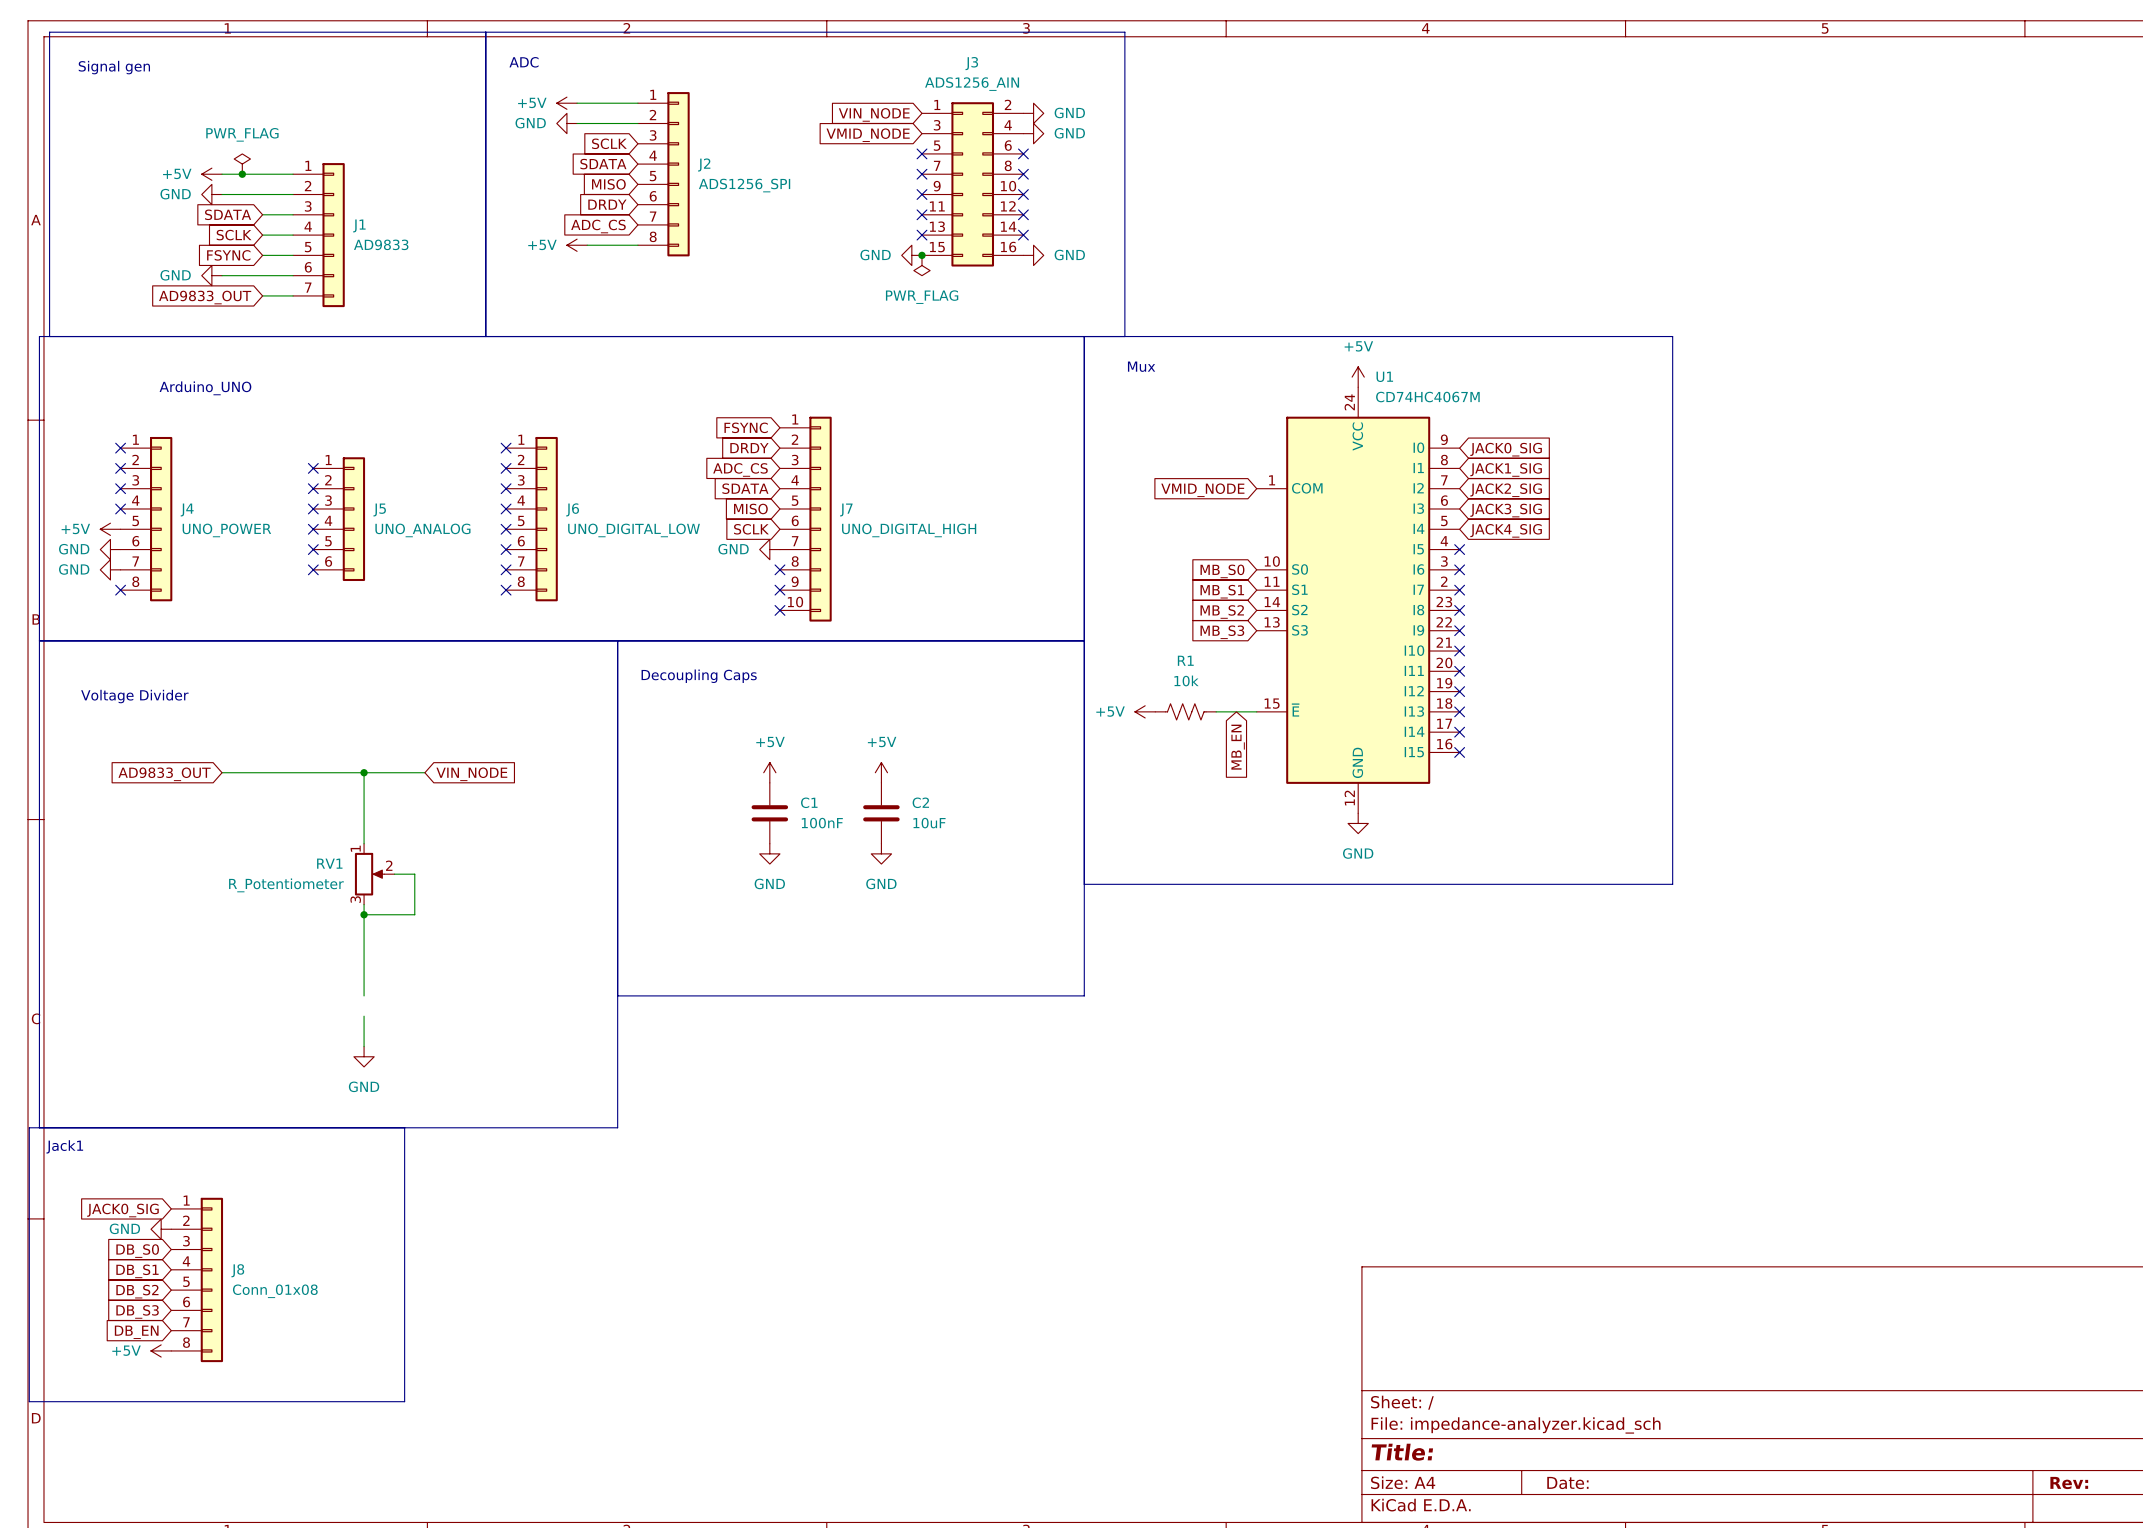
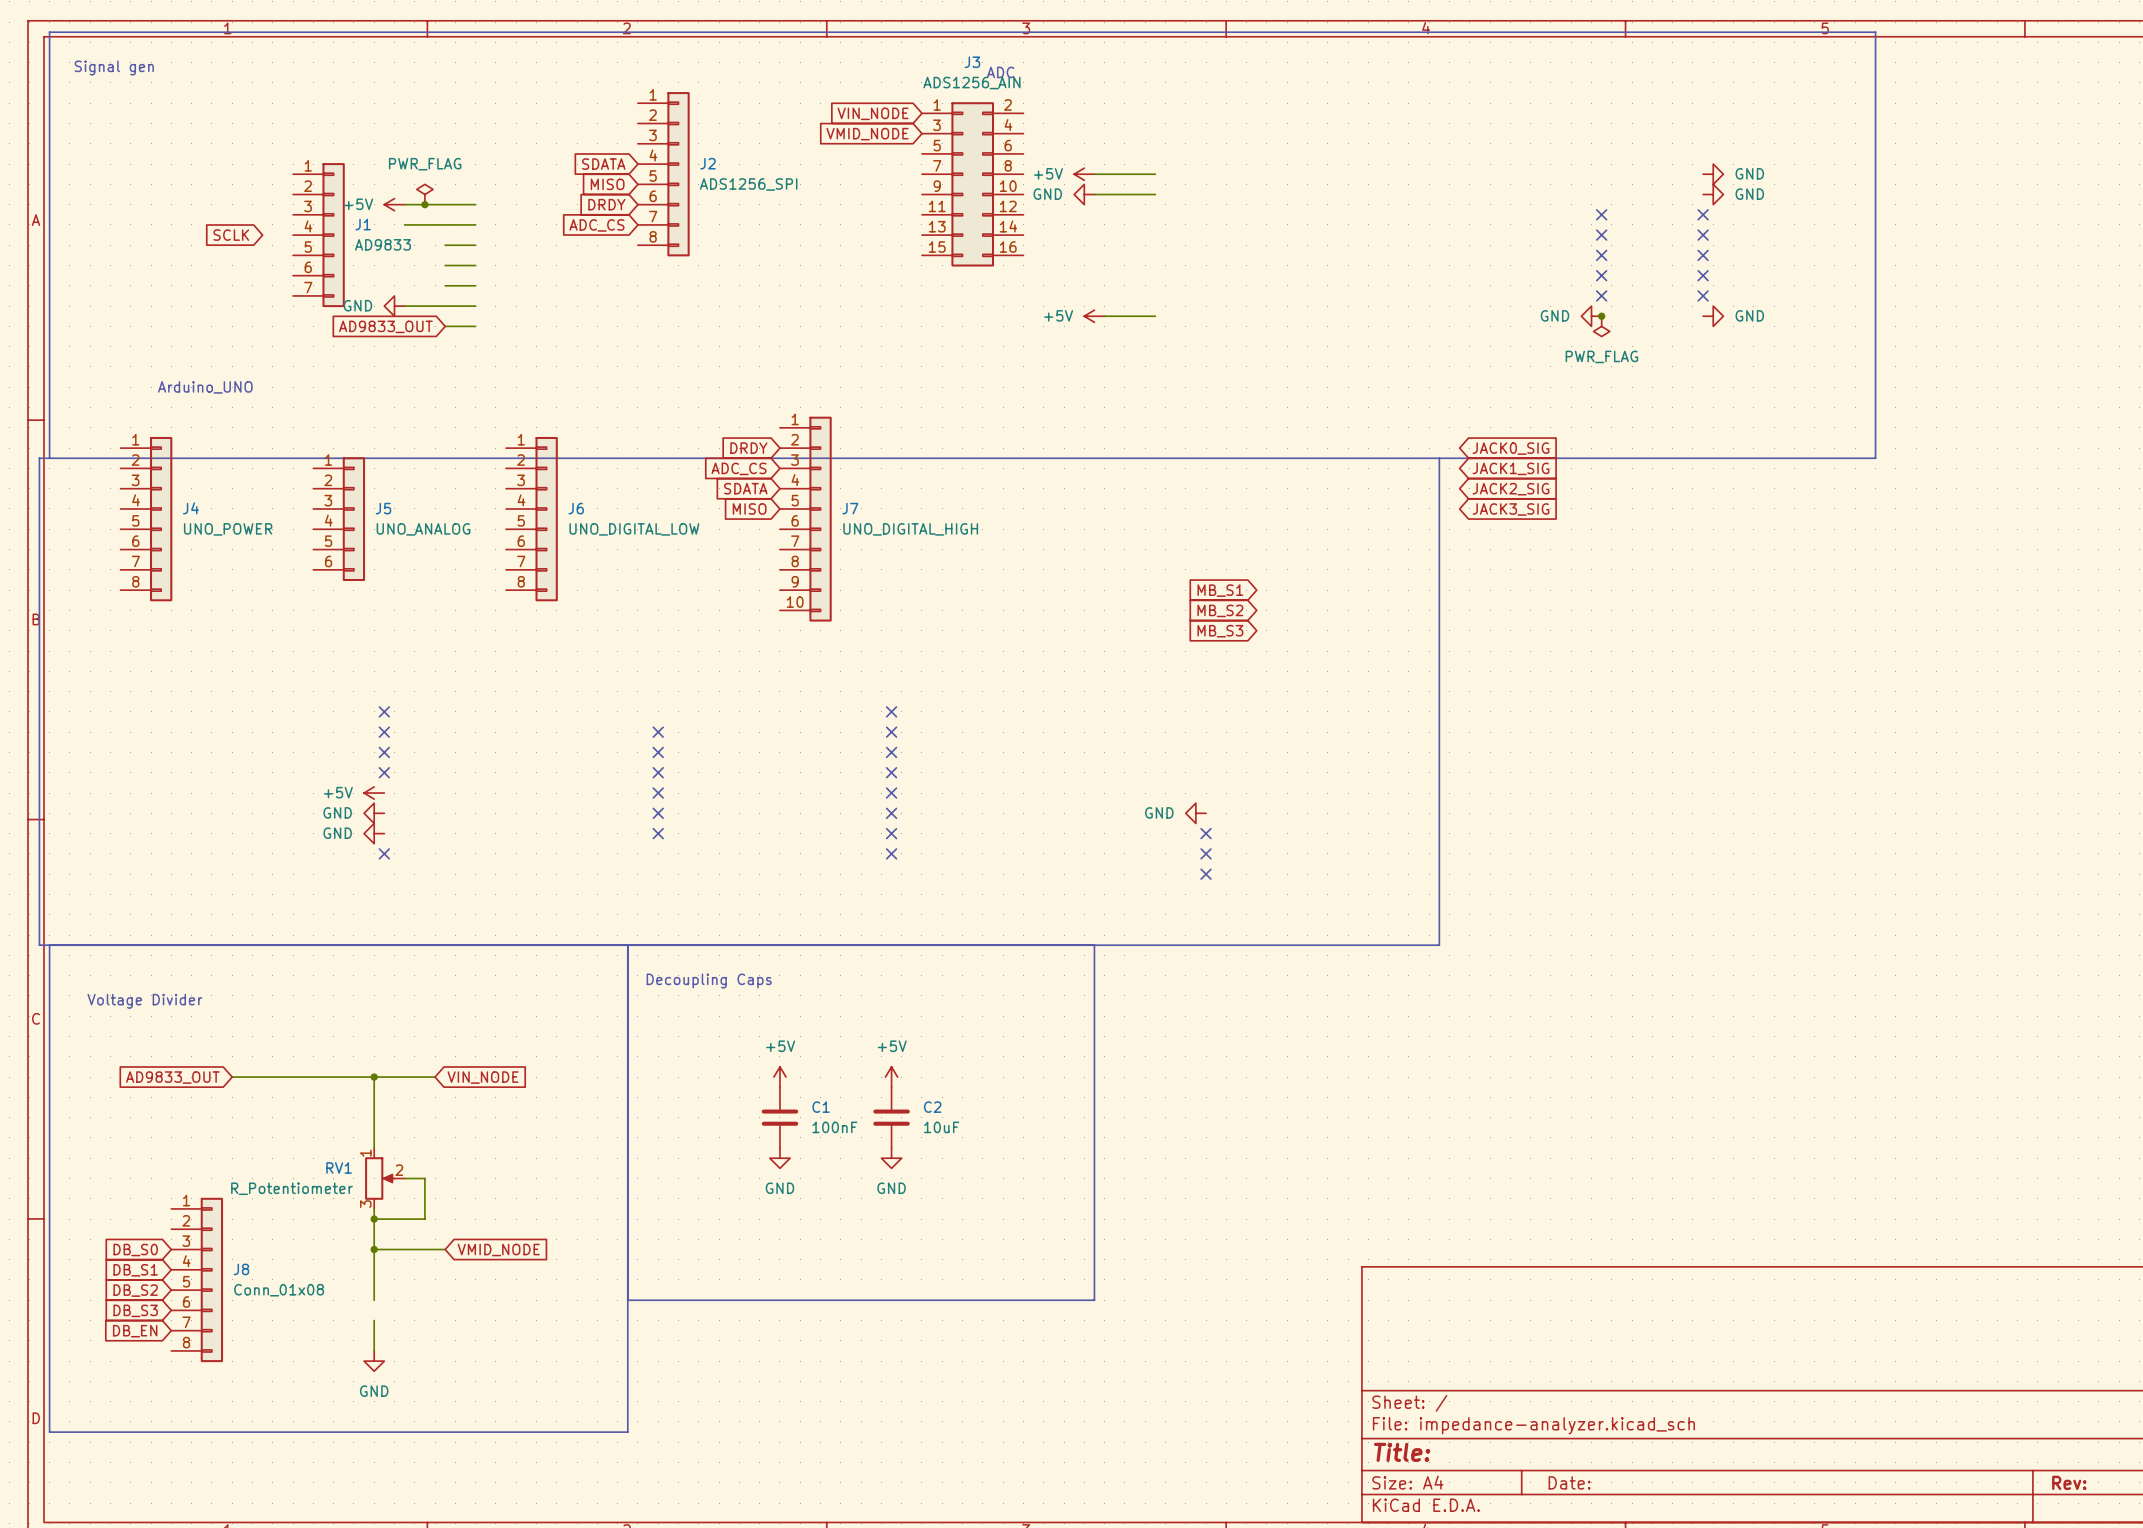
line: (485, 32) (485, 336) -> none
line: (1124, 32) (1124, 336) -> none
text: ADC (524, 62) -> none
text: none -> ADC (1000, 72)
power symbol: +5V (566, 103) -> none
wire: (577, 103) (637, 103) -> none
power symbol: GND (1033, 113) -> none
power symbol: GND (566, 123) -> none
wire: (577, 123) (637, 123) -> none
power symbol: GND (1033, 133) -> none
global label: SCLK (609, 143) -> none
no-connect mark: (921, 153) -> none
no-connect mark: (1023, 153) -> none
power symbol position: PWR_FLAG (242, 164) -> PWR_FLAG (424, 194)
power symbol: +5V (211, 174) -> none
wire: (222, 174) (293, 174) -> (404, 204) (475, 204)
junction: (242, 174) -> none
no-connect mark: (921, 174) -> none
no-connect mark: (1023, 174) -> none
power symbol: none -> +5V (1084, 174)
wire: none -> (1094, 174) (1155, 174)
power symbol: none -> GND (1713, 174)
power symbol: GND (211, 194) -> none
wire: (222, 194) (293, 194) -> (404, 224) (475, 224)
no-connect mark: (921, 194) -> none
no-connect mark: (1023, 194) -> none
power symbol: none -> GND (1084, 194)
wire: none -> (1094, 194) (1155, 194)
power symbol: none -> GND (1713, 194)
power symbol: none -> +5V (394, 204)
junction: none -> (424, 204)
global label: SDATA (228, 214) -> none
wire: (262, 214) (293, 214) -> (445, 245) (475, 245)
no-connect mark: (921, 214) -> none
no-connect mark: (1023, 214) -> none
no-connect mark: none -> (1601, 214)
no-connect mark: none -> (1703, 214)
wire: (262, 235) (293, 235) -> (445, 265) (475, 265)
no-connect mark: (921, 235) -> none
no-connect mark: (1023, 235) -> none
no-connect mark: none -> (1601, 235)
no-connect mark: none -> (1703, 235)
power symbol: +5V (577, 245) -> none
wire: (587, 245) (637, 245) -> none
global label: FSYNC (228, 255) -> none
wire: (262, 255) (293, 255) -> (445, 285) (475, 285)
power symbol: GND (911, 255) -> none
junction: (921, 255) -> none
power symbol: GND (1033, 255) -> none
no-connect mark: none -> (1601, 255)
no-connect mark: none -> (1703, 255)
power symbol: PWR_FLAG (921, 265) -> none
power symbol: GND (211, 275) -> none
wire: (222, 275) (293, 275) -> (404, 306) (475, 306)
no-connect mark: none -> (1601, 275)
no-connect mark: none -> (1703, 275)
wire: (262, 295) (293, 295) -> (445, 326) (475, 326)
no-connect mark: none -> (1601, 295)
no-connect mark: none -> (1703, 295)
global label position: AD9833_OUT (205, 297) -> AD9833_OUT (385, 326)
power symbol: none -> GND (394, 306)
power symbol: none -> +5V (1094, 316)
wire: none -> (1104, 316) (1155, 316)
power symbol: none -> GND (1591, 316)
junction: none -> (1601, 316)
power symbol: none -> GND (1713, 316)
power symbol: none -> PWR_FLAG (1601, 326)
line: none -> (49, 336) (49, 458)
line: (1084, 336) (1084, 995) (617, 995) -> none
text: Mux (1141, 366) -> none
power symbol: +5V (1358, 377) -> none
global label: FSYNC (746, 427) -> none
no-connect mark: (120, 448) -> none
no-connect mark: (506, 448) -> none
line: (39, 458) (39, 336) (1672, 336) (1672, 884) (1084, 884) -> (39, 458) (1875, 458) (1875, 32) (1124, 32)
no-connect mark: (120, 468) -> none
no-connect mark: (313, 468) -> none
no-connect mark: (506, 468) -> none
no-connect mark: (120, 488) -> none
no-connect mark: (313, 488) -> none
no-connect mark: (506, 488) -> none
global label: VMID_NODE (1202, 490) -> none
no-connect mark: (120, 508) -> none
no-connect mark: (313, 508) -> none
no-connect mark: (506, 508) -> none
power symbol: +5V (110, 529) -> none
no-connect mark: (313, 529) -> none
no-connect mark: (506, 529) -> none
global label: SCLK (751, 529) -> none
global label: JACK4_SIG (1506, 530) -> none
power symbol: GND (110, 549) -> none
no-connect mark: (313, 549) -> none
no-connect mark: (506, 549) -> none
power symbol: GND (769, 549) -> none
no-connect mark: (1459, 549) -> none
power symbol: GND (110, 569) -> none
no-connect mark: (313, 569) -> none
no-connect mark: (506, 569) -> none
no-connect mark: (779, 569) -> none
no-connect mark: (1459, 569) -> none
global label: MB_S0 (1222, 571) -> none
no-connect mark: (120, 590) -> none
no-connect mark: (506, 590) -> none
no-connect mark: (779, 590) -> none
no-connect mark: (1459, 590) -> none
U1: CD74HC4067M (1358, 600) -> none
no-connect mark: (779, 610) -> none
no-connect mark: (1459, 610) -> none
no-connect mark: (1459, 630) -> none
line: (39, 640) (1084, 640) -> none
line: (617, 640) (617, 1127) (29, 1127) (29, 1401) (404, 1401) (404, 1127) -> none
no-connect mark: (1459, 651) -> none
no-connect mark: (1459, 671) -> none
text: Decoupling Caps (699, 676) -> none
no-connect mark: (1459, 691) -> none
text: Voltage Divider (134, 696) -> none
no-connect mark: none -> (384, 711)
no-connect mark: none -> (891, 711)
power symbol: +5V (1145, 711) -> none
R1: 10k (1185, 711) -> none
wire: (1216, 711) (1256, 711) -> none
no-connect mark: (1459, 711) -> none
no-connect mark: none -> (384, 732)
no-connect mark: none -> (658, 732)
no-connect mark: none -> (891, 732)
no-connect mark: (1459, 732) -> none
global label: MB_EN (1238, 747) -> none
no-connect mark: none -> (384, 752)
no-connect mark: none -> (658, 752)
no-connect mark: none -> (891, 752)
no-connect mark: (1459, 752) -> none
wire: (222, 772) (424, 772) -> none
wire: (364, 772) (364, 843) -> none
junction: (364, 772) -> none
no-connect mark: none -> (384, 772)
no-connect mark: none -> (658, 772)
power symbol: +5V (769, 772) -> none
power symbol: +5V (881, 772) -> none
no-connect mark: none -> (891, 772)
global label: AD9833_OUT (164, 774) -> none
global label: VIN_NODE (471, 774) -> none
power symbol: none -> +5V (374, 793)
no-connect mark: none -> (658, 793)
no-connect mark: none -> (891, 793)
power symbol: none -> GND (374, 813)
no-connect mark: none -> (658, 813)
C1 position: (769, 813) -> (779, 1117)
C2 position: (881, 813) -> (891, 1117)
no-connect mark: none -> (891, 813)
power symbol: none -> GND (1195, 813)
power symbol: GND (1358, 823) -> none
power symbol: none -> GND (374, 833)
no-connect mark: none -> (658, 833)
no-connect mark: none -> (891, 833)
no-connect mark: none -> (1206, 833)
no-connect mark: none -> (384, 853)
power symbol: GND (769, 853) -> none
power symbol: GND (881, 853) -> none
no-connect mark: none -> (891, 853)
no-connect mark: none -> (1206, 853)
RV1 position: (374, 874) -> (384, 1178)
wire: (394, 874) (414, 874) (414, 914) (364, 914) -> none
no-connect mark: none -> (1206, 874)
wire: (364, 904) (364, 995) -> none
junction: (364, 914) -> none
line: (39, 945) (39, 1127) -> (39, 945) (1439, 945) (1439, 458)
line: none -> (49, 945) (49, 1432) (627, 1432) (627, 945)
line: none -> (1094, 945) (1094, 1300) (627, 1300)
text: none -> Decoupling Caps (709, 981)
text: none -> Voltage Divider (144, 1001)
wire: (364, 1016) (364, 1046) -> none
power symbol: GND (364, 1056) -> none
wire: none -> (232, 1077) (435, 1077)
wire: none -> (374, 1077) (374, 1148)
junction: none -> (374, 1077)
power symbol: none -> +5V (779, 1077)
power symbol: none -> +5V (891, 1077)
global label: none -> AD9833_OUT (172, 1077)
global label: none -> VIN_NODE (483, 1077)
text: Jack1 (64, 1146) -> none
power symbol: none -> GND (779, 1158)
power symbol: none -> GND (891, 1158)
wire: none -> (404, 1178) (424, 1178) (424, 1219) (374, 1219)
wire: none -> (374, 1208) (374, 1300)
global label: JACK0_SIG (122, 1210) -> none
junction: none -> (374, 1219)
power symbol: GND (161, 1229) -> none
wire: none -> (374, 1249) (445, 1249)
junction: none -> (374, 1249)
global label: none -> VMID_NODE (498, 1250)
wire: none -> (374, 1320) (374, 1350)
power symbol: +5V (161, 1350) -> none
power symbol: none -> GND (374, 1361)

